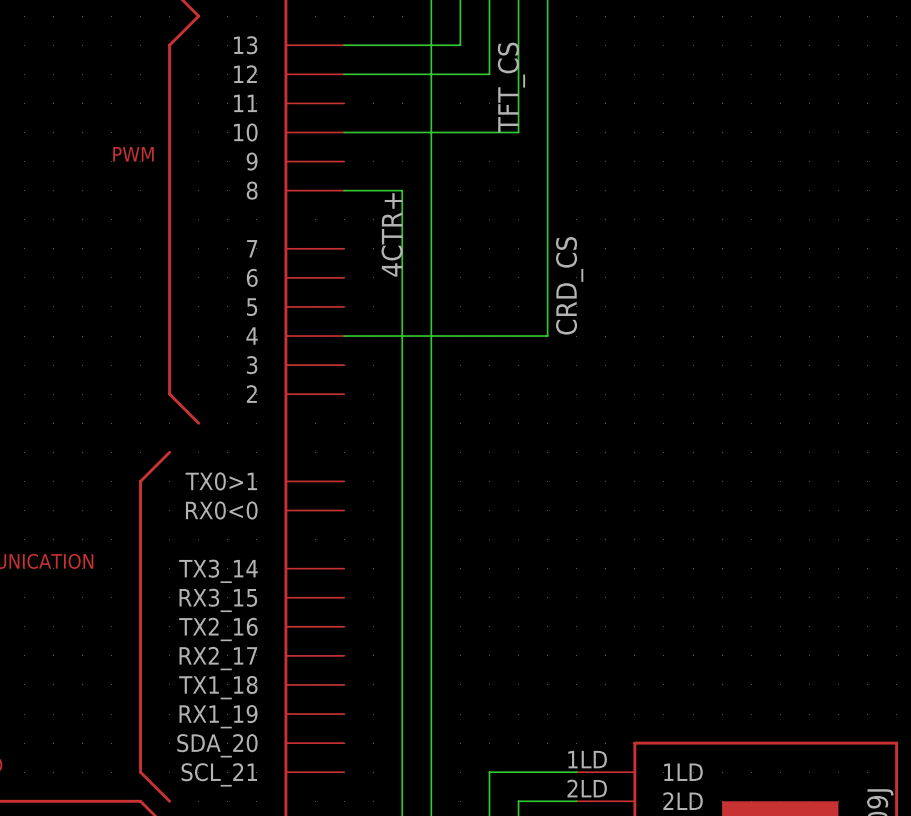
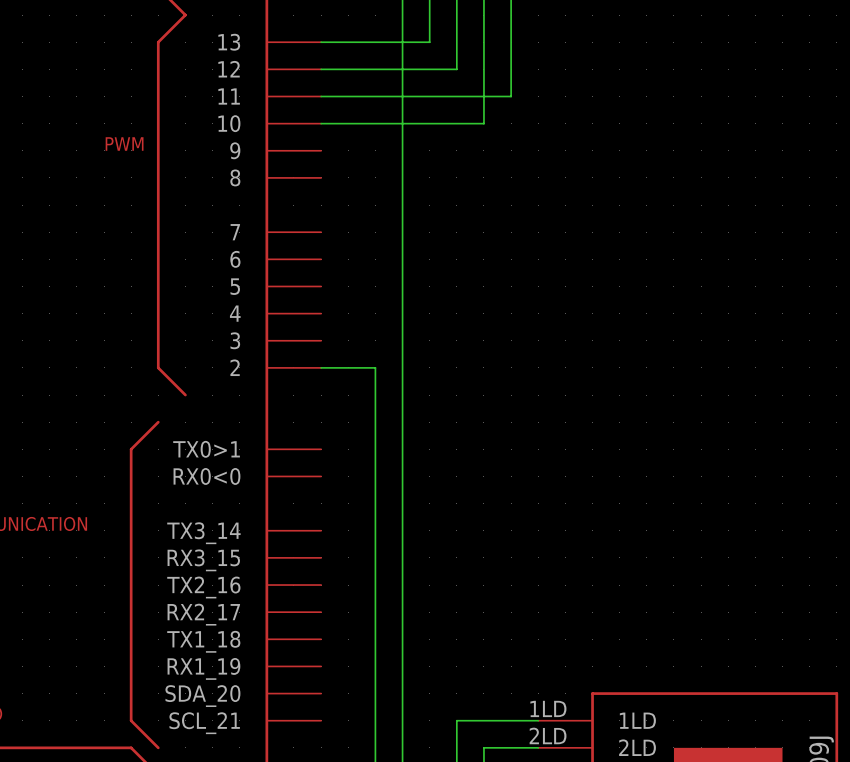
label: TFT_CS (511, 87) -> none
wire: (547, 103) (547, 336) (344, 336) -> (511, 96) (321, 96)
wire: (344, 190) (402, 190) (402, 394) -> (321, 367) (375, 367)
label: 4CTR+ (392, 234) -> none
label: CRD_CS (569, 285) -> none

